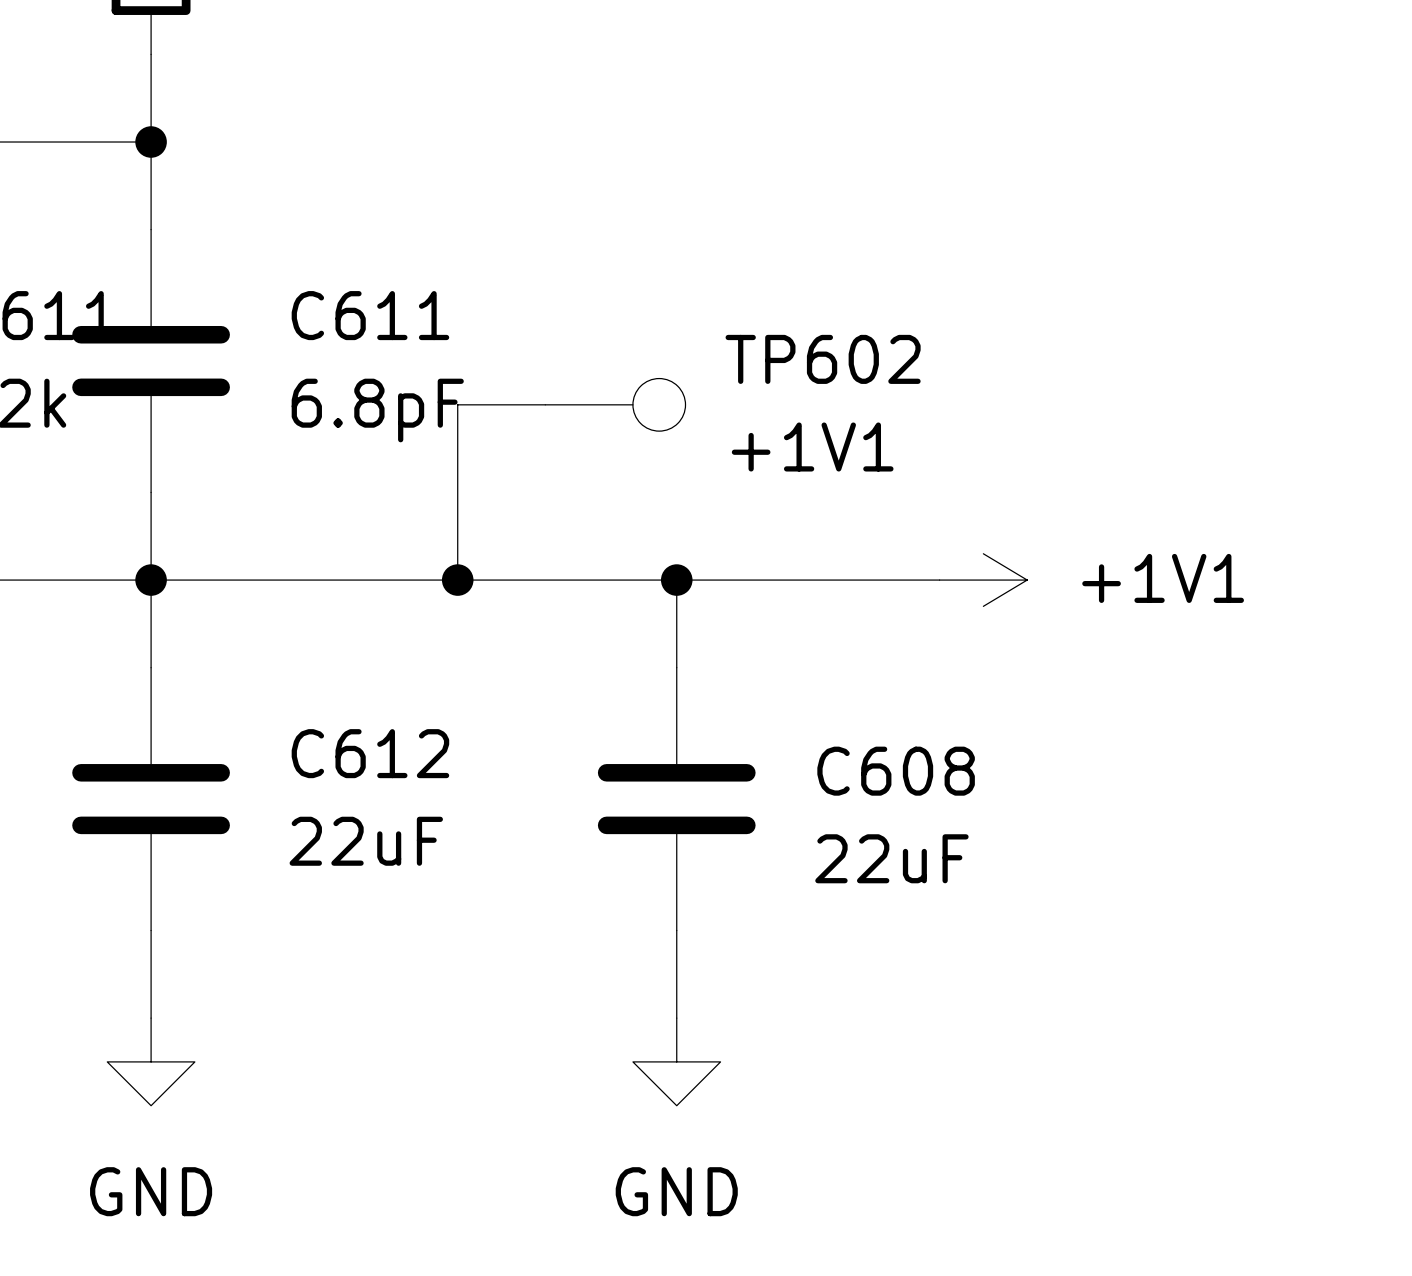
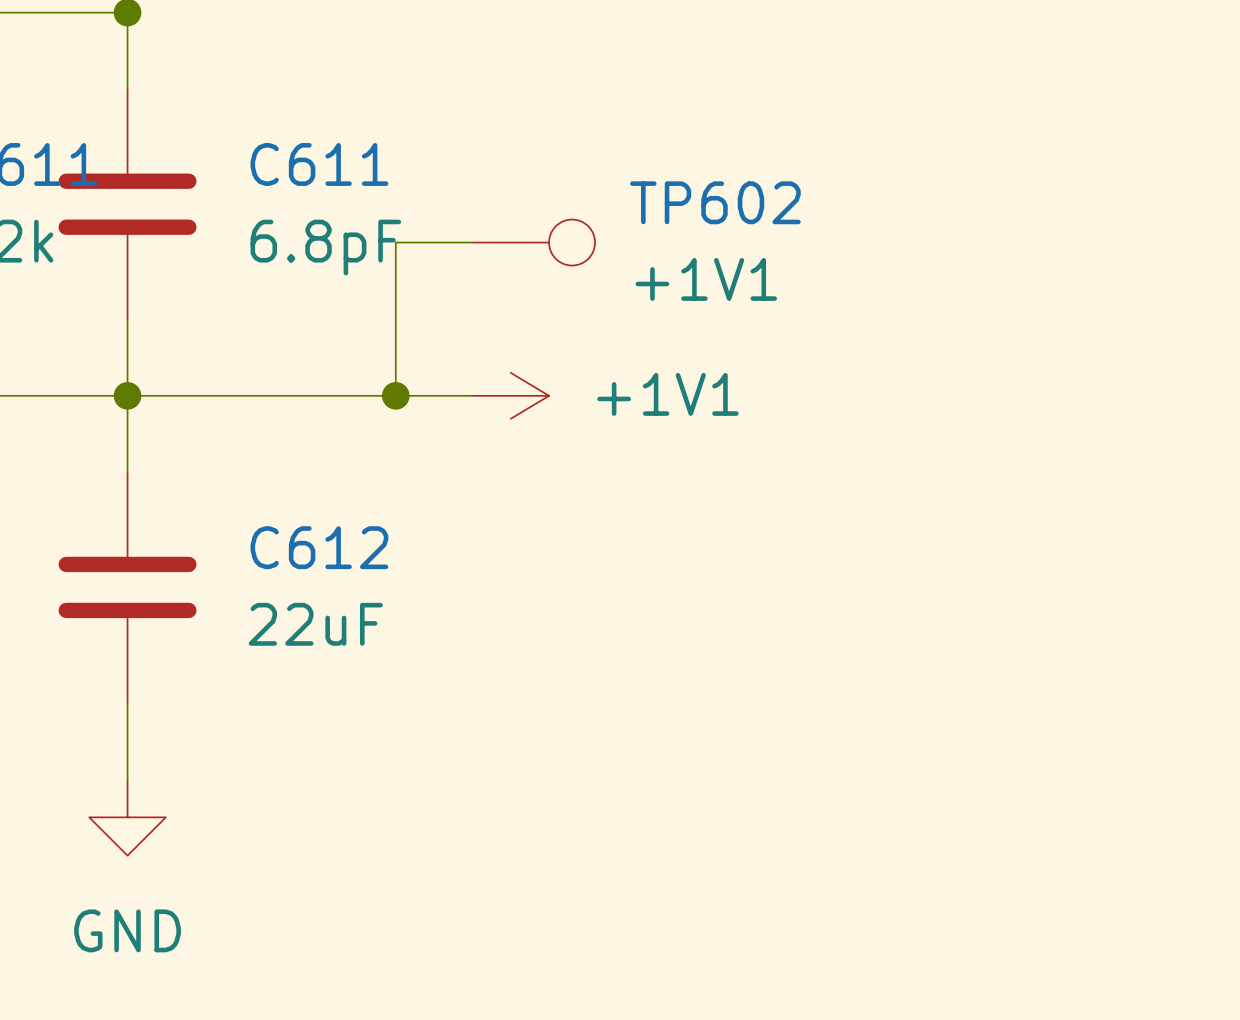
wire: (545, 580) (939, 580) -> none
wire: (676, 580) (676, 667) -> none
junction: (676, 580) -> none
power symbol position: +1V1 (983, 580) -> +1V1 (510, 395)
C608: 22uF (676, 799) -> none
wire: (676, 930) (676, 1018) -> none
power symbol: GND (676, 1061) -> none

